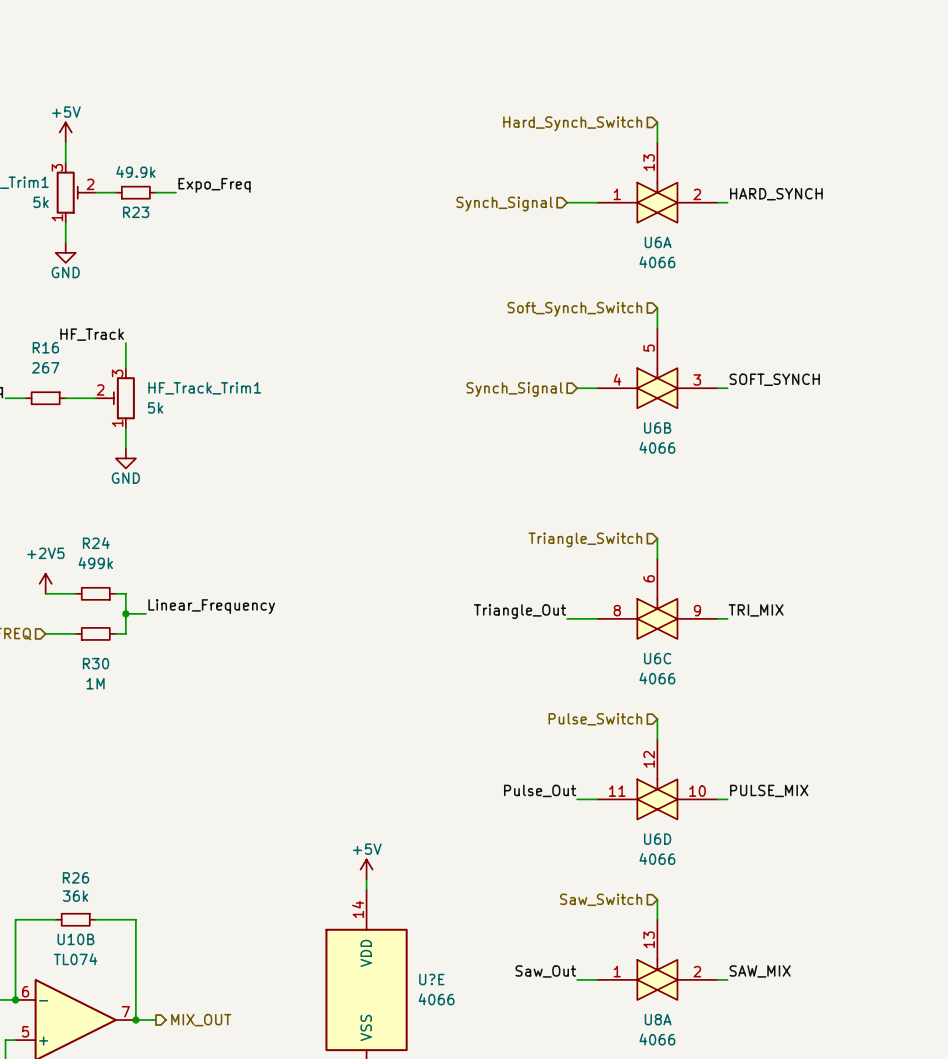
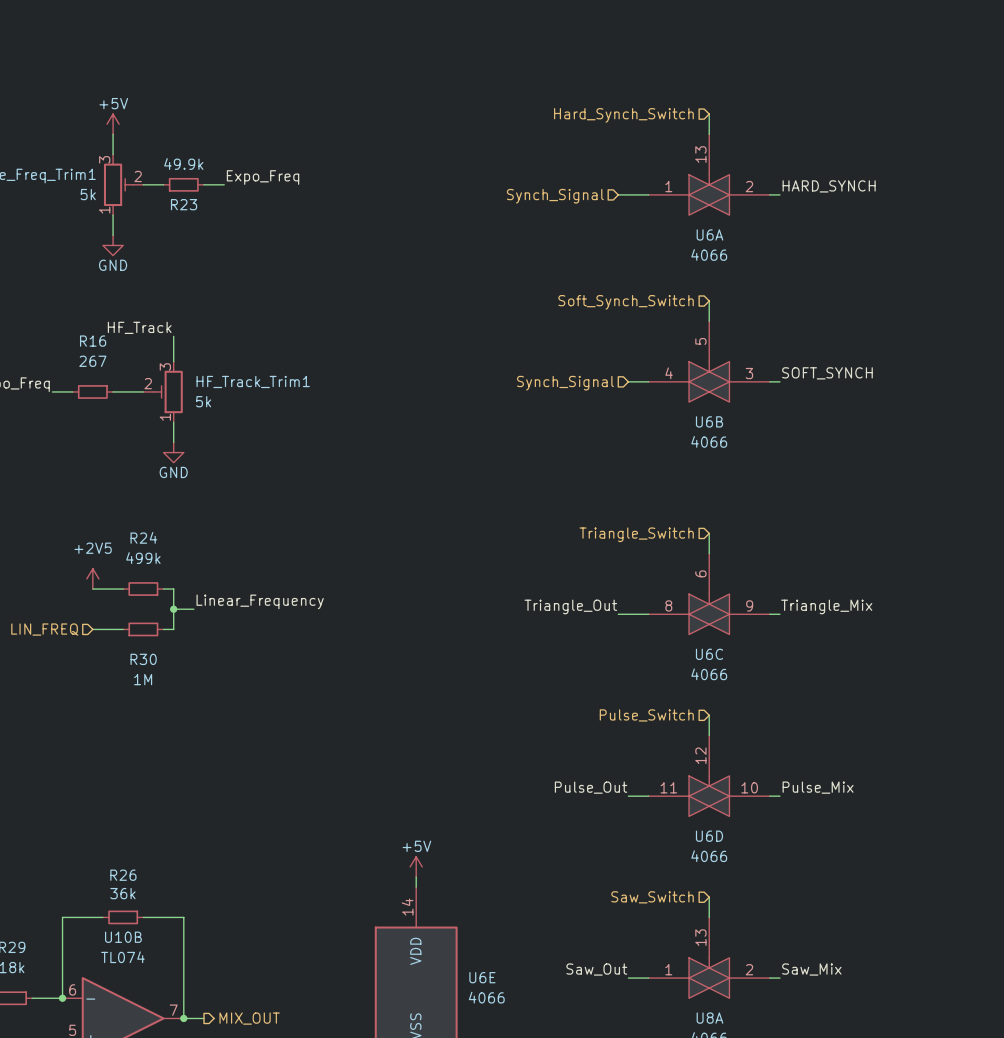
label: TRI_MIX (756, 610) -> Triangle_Mix (826, 606)
label: PULSE_MIX (769, 790) -> Pulse_Mix (818, 787)
label: SAW_MIX (760, 971) -> Saw_Mix (811, 969)
U?E name: U?E (431, 979) -> U6E (482, 977)

